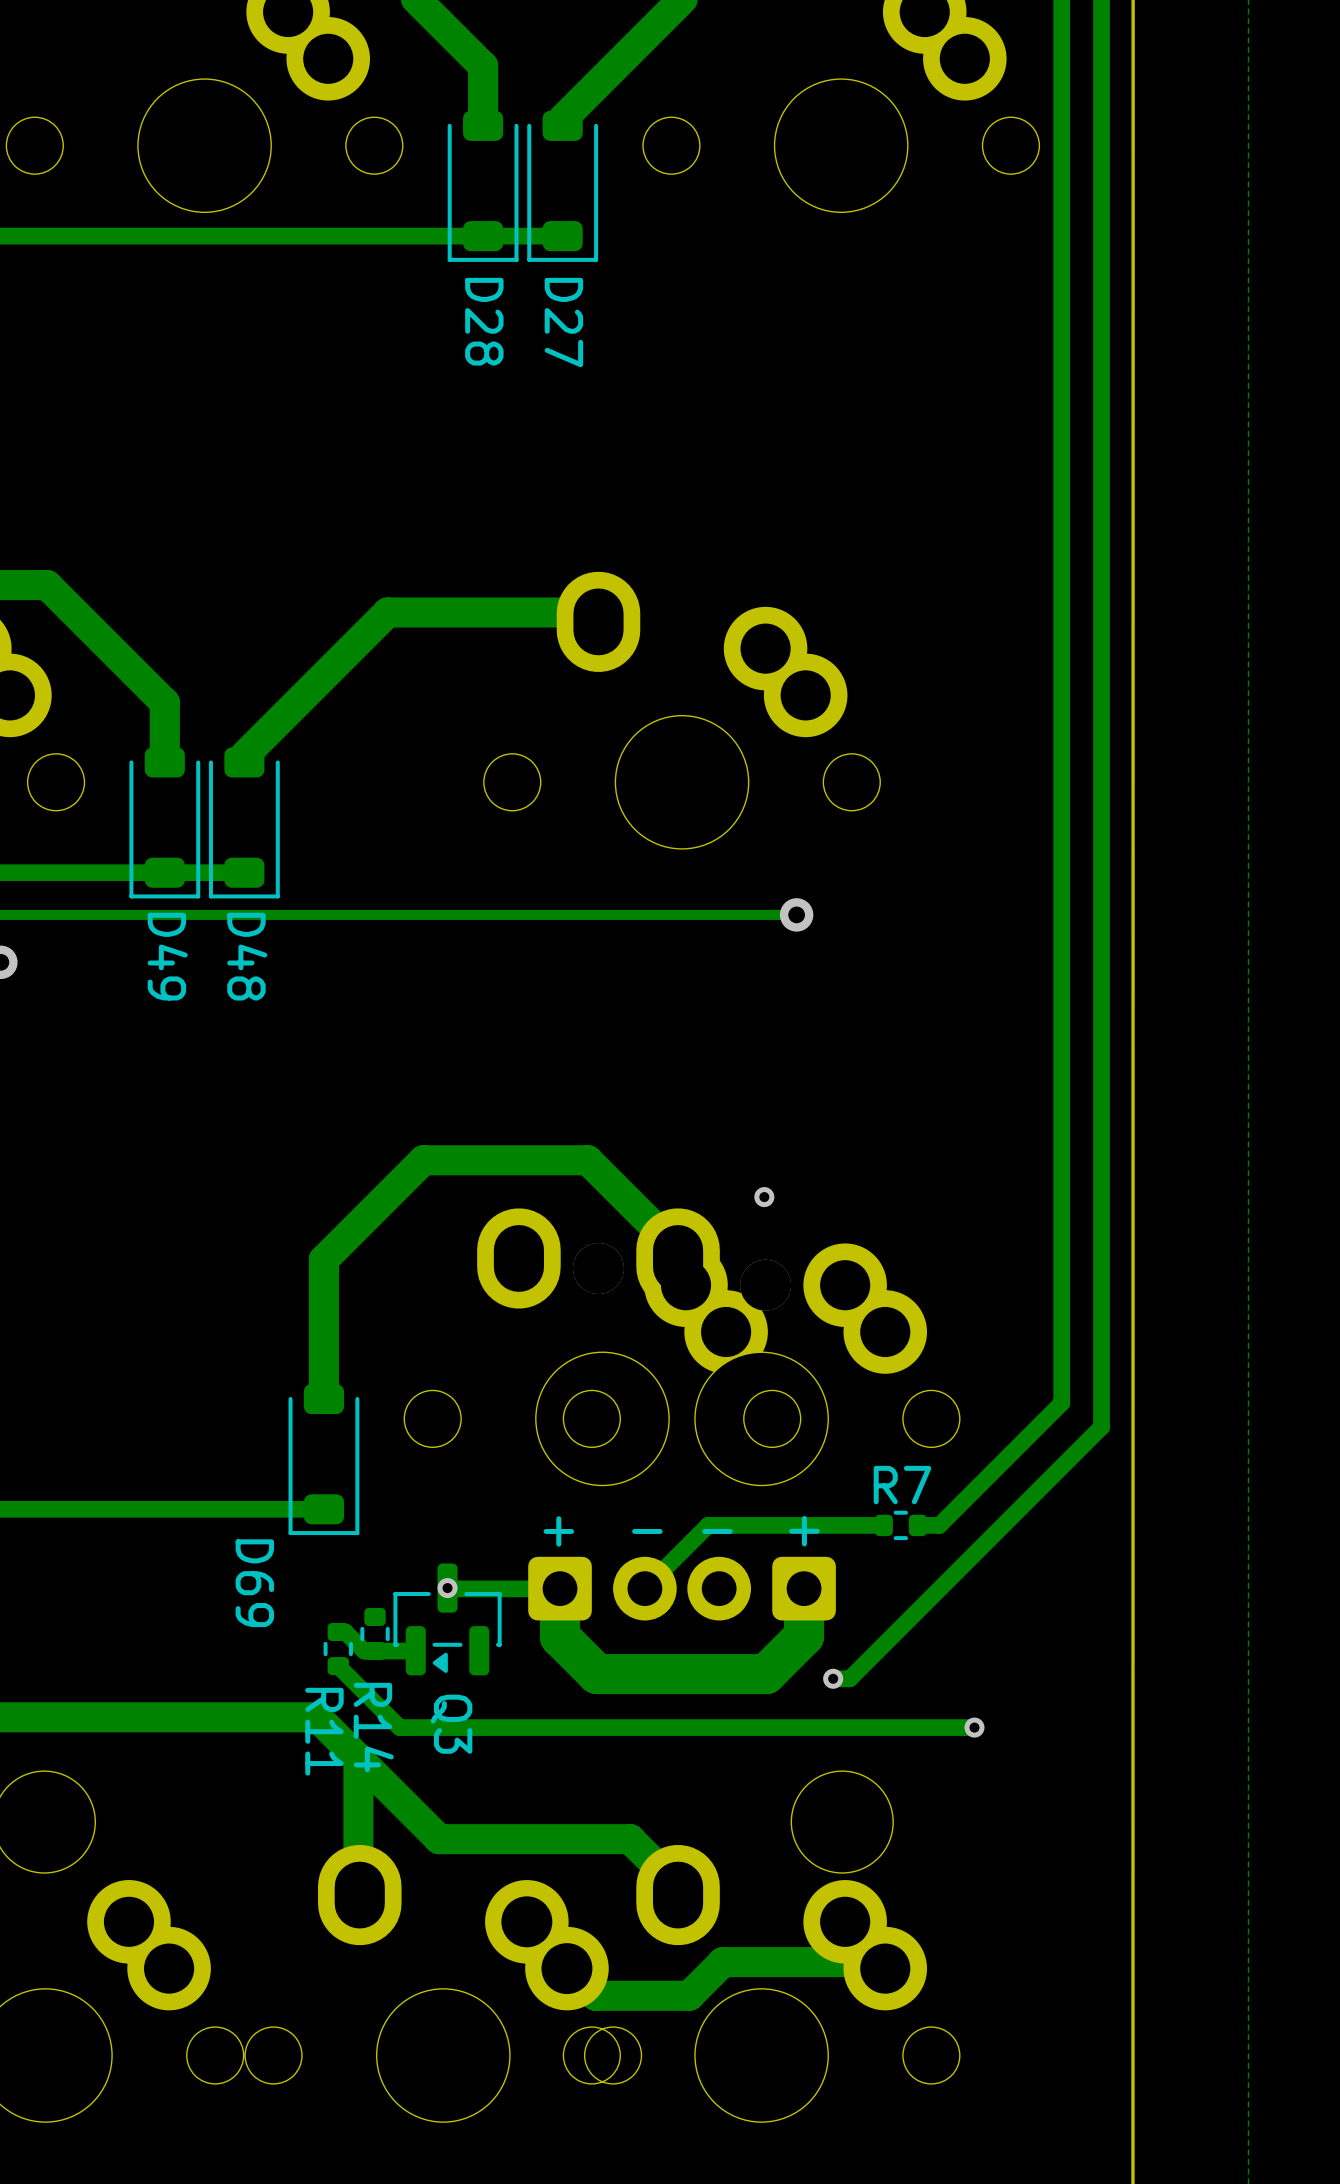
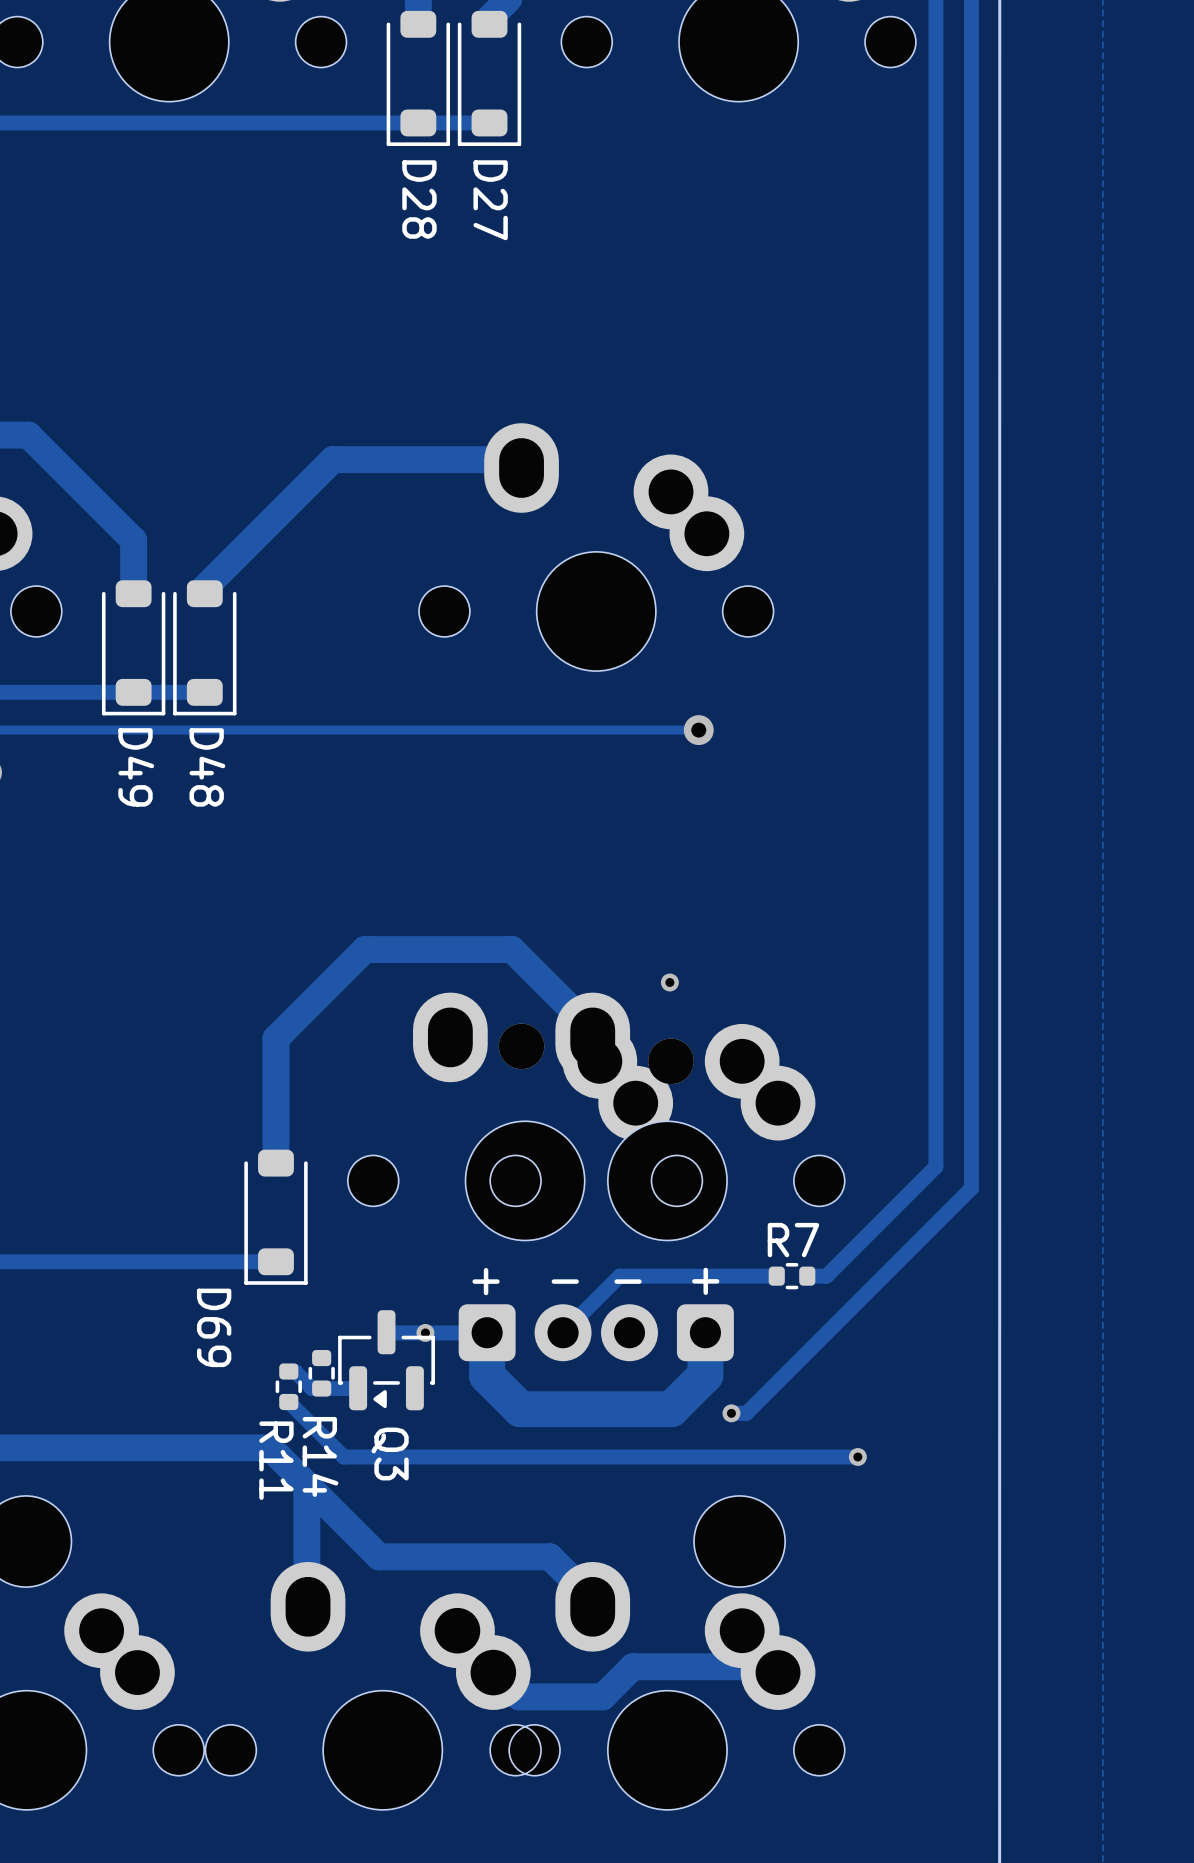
via position: (447, 1588) -> (425, 1332)

